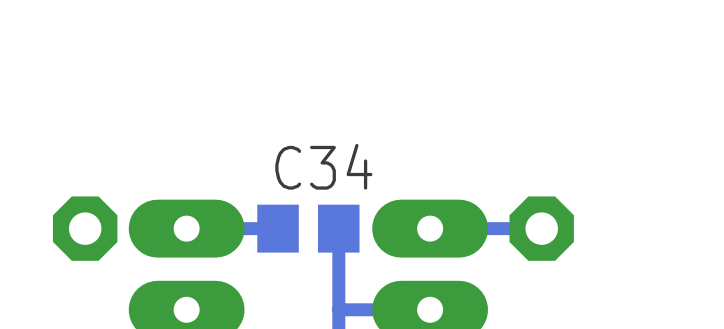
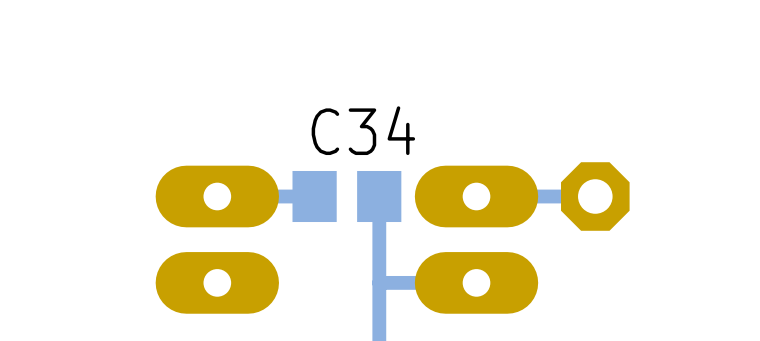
part: (85, 228) -> none

